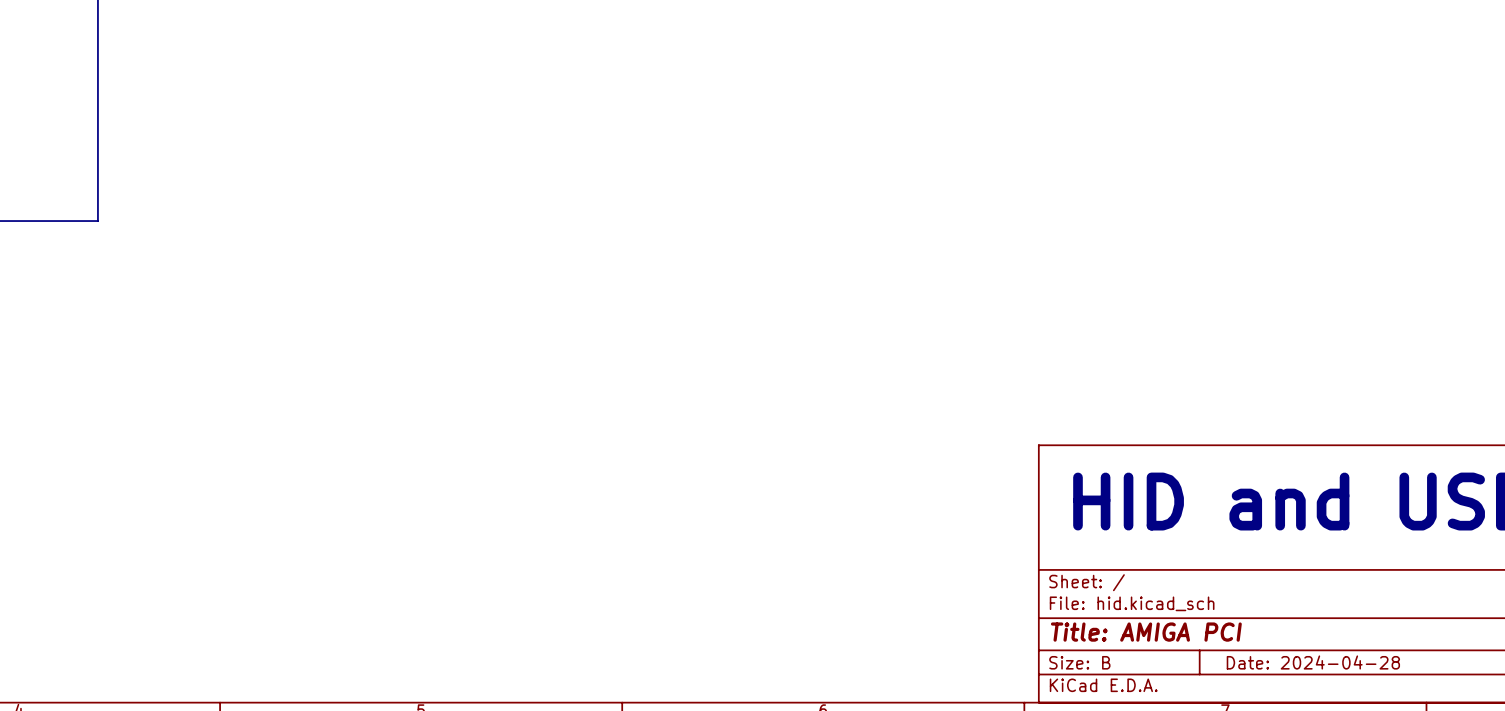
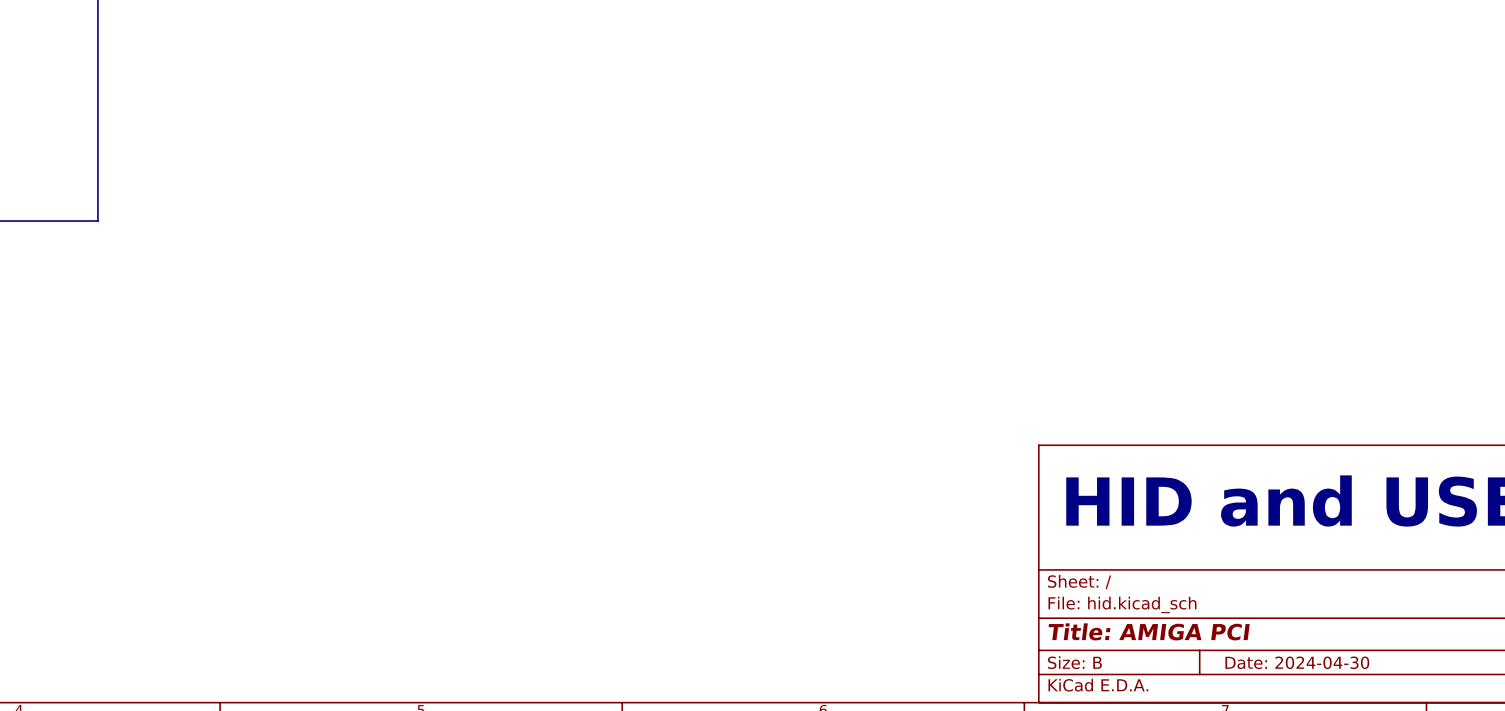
title block: Date: 2024-04-28 (1313, 662) -> Date: 2024-04-30 (1297, 662)

